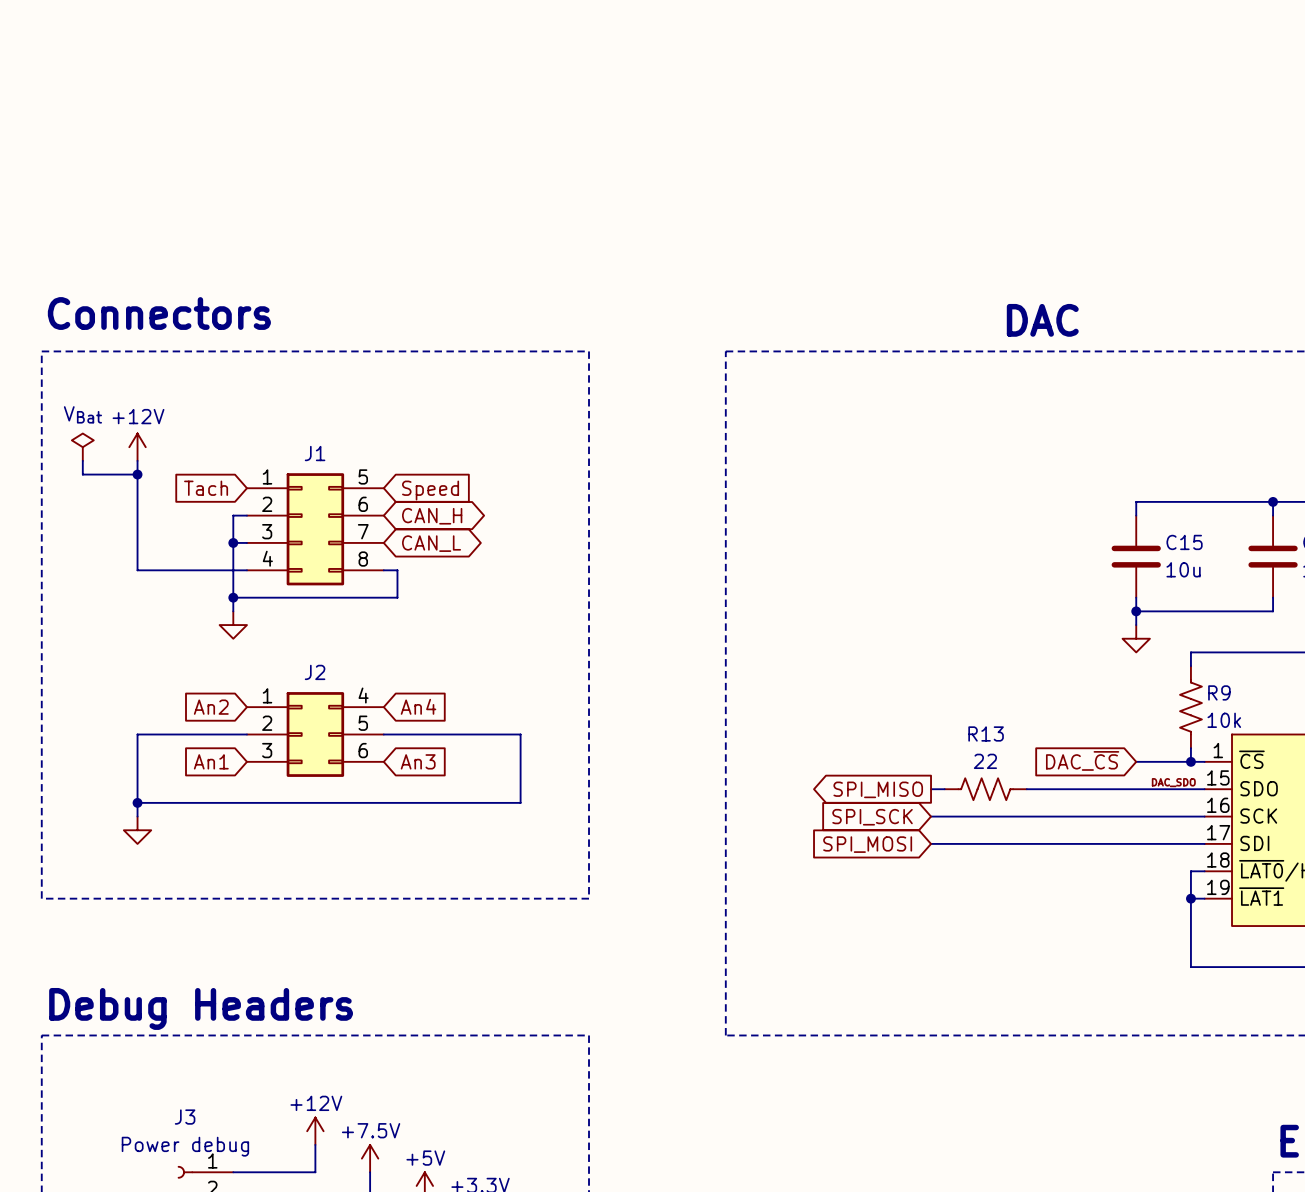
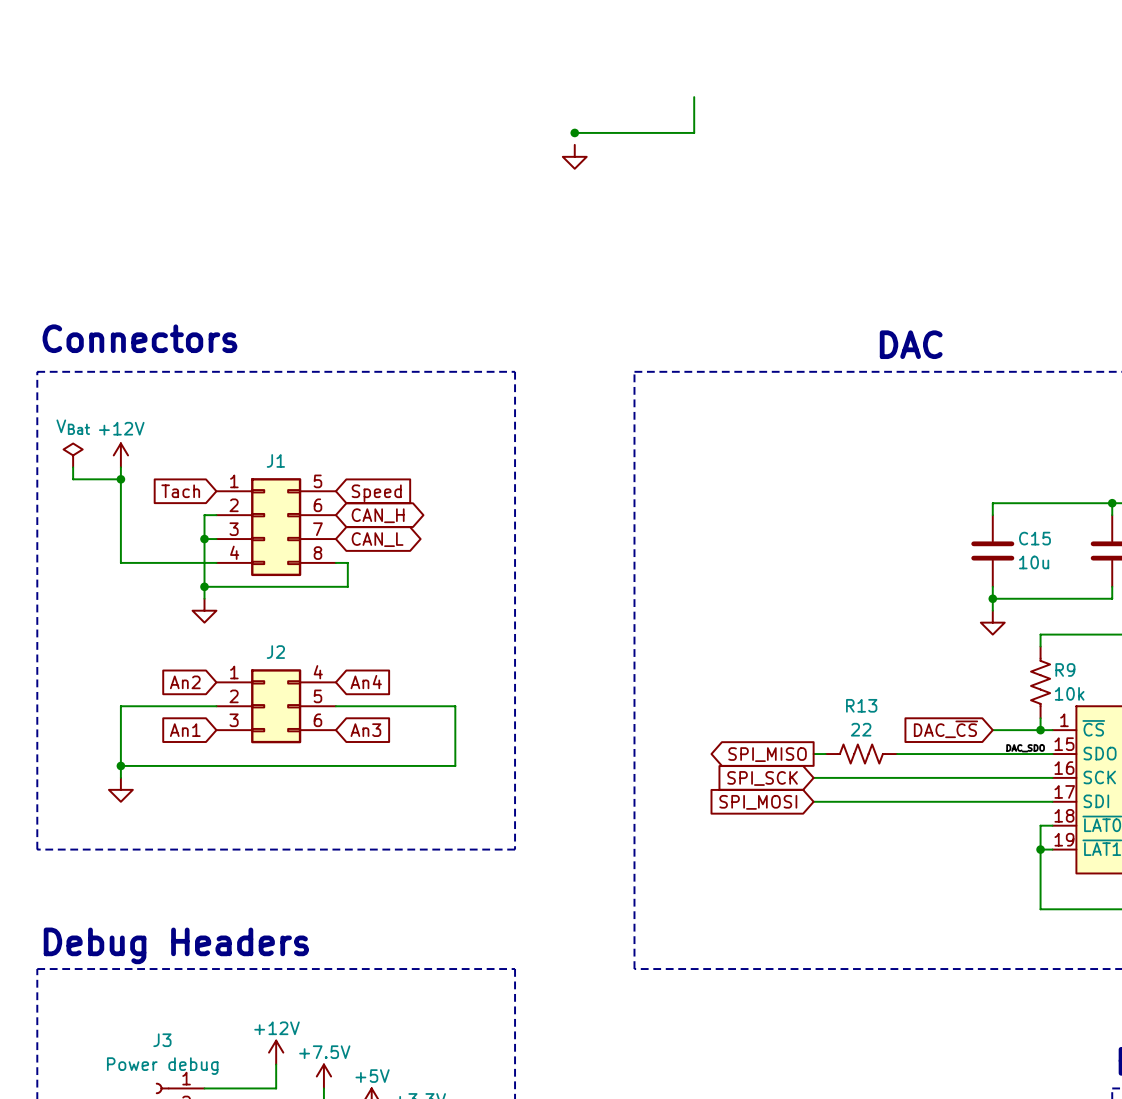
wire: none -> (694, 97) (694, 132) (574, 132)
junction: none -> (574, 132)
power symbol: none -> (574, 156)

